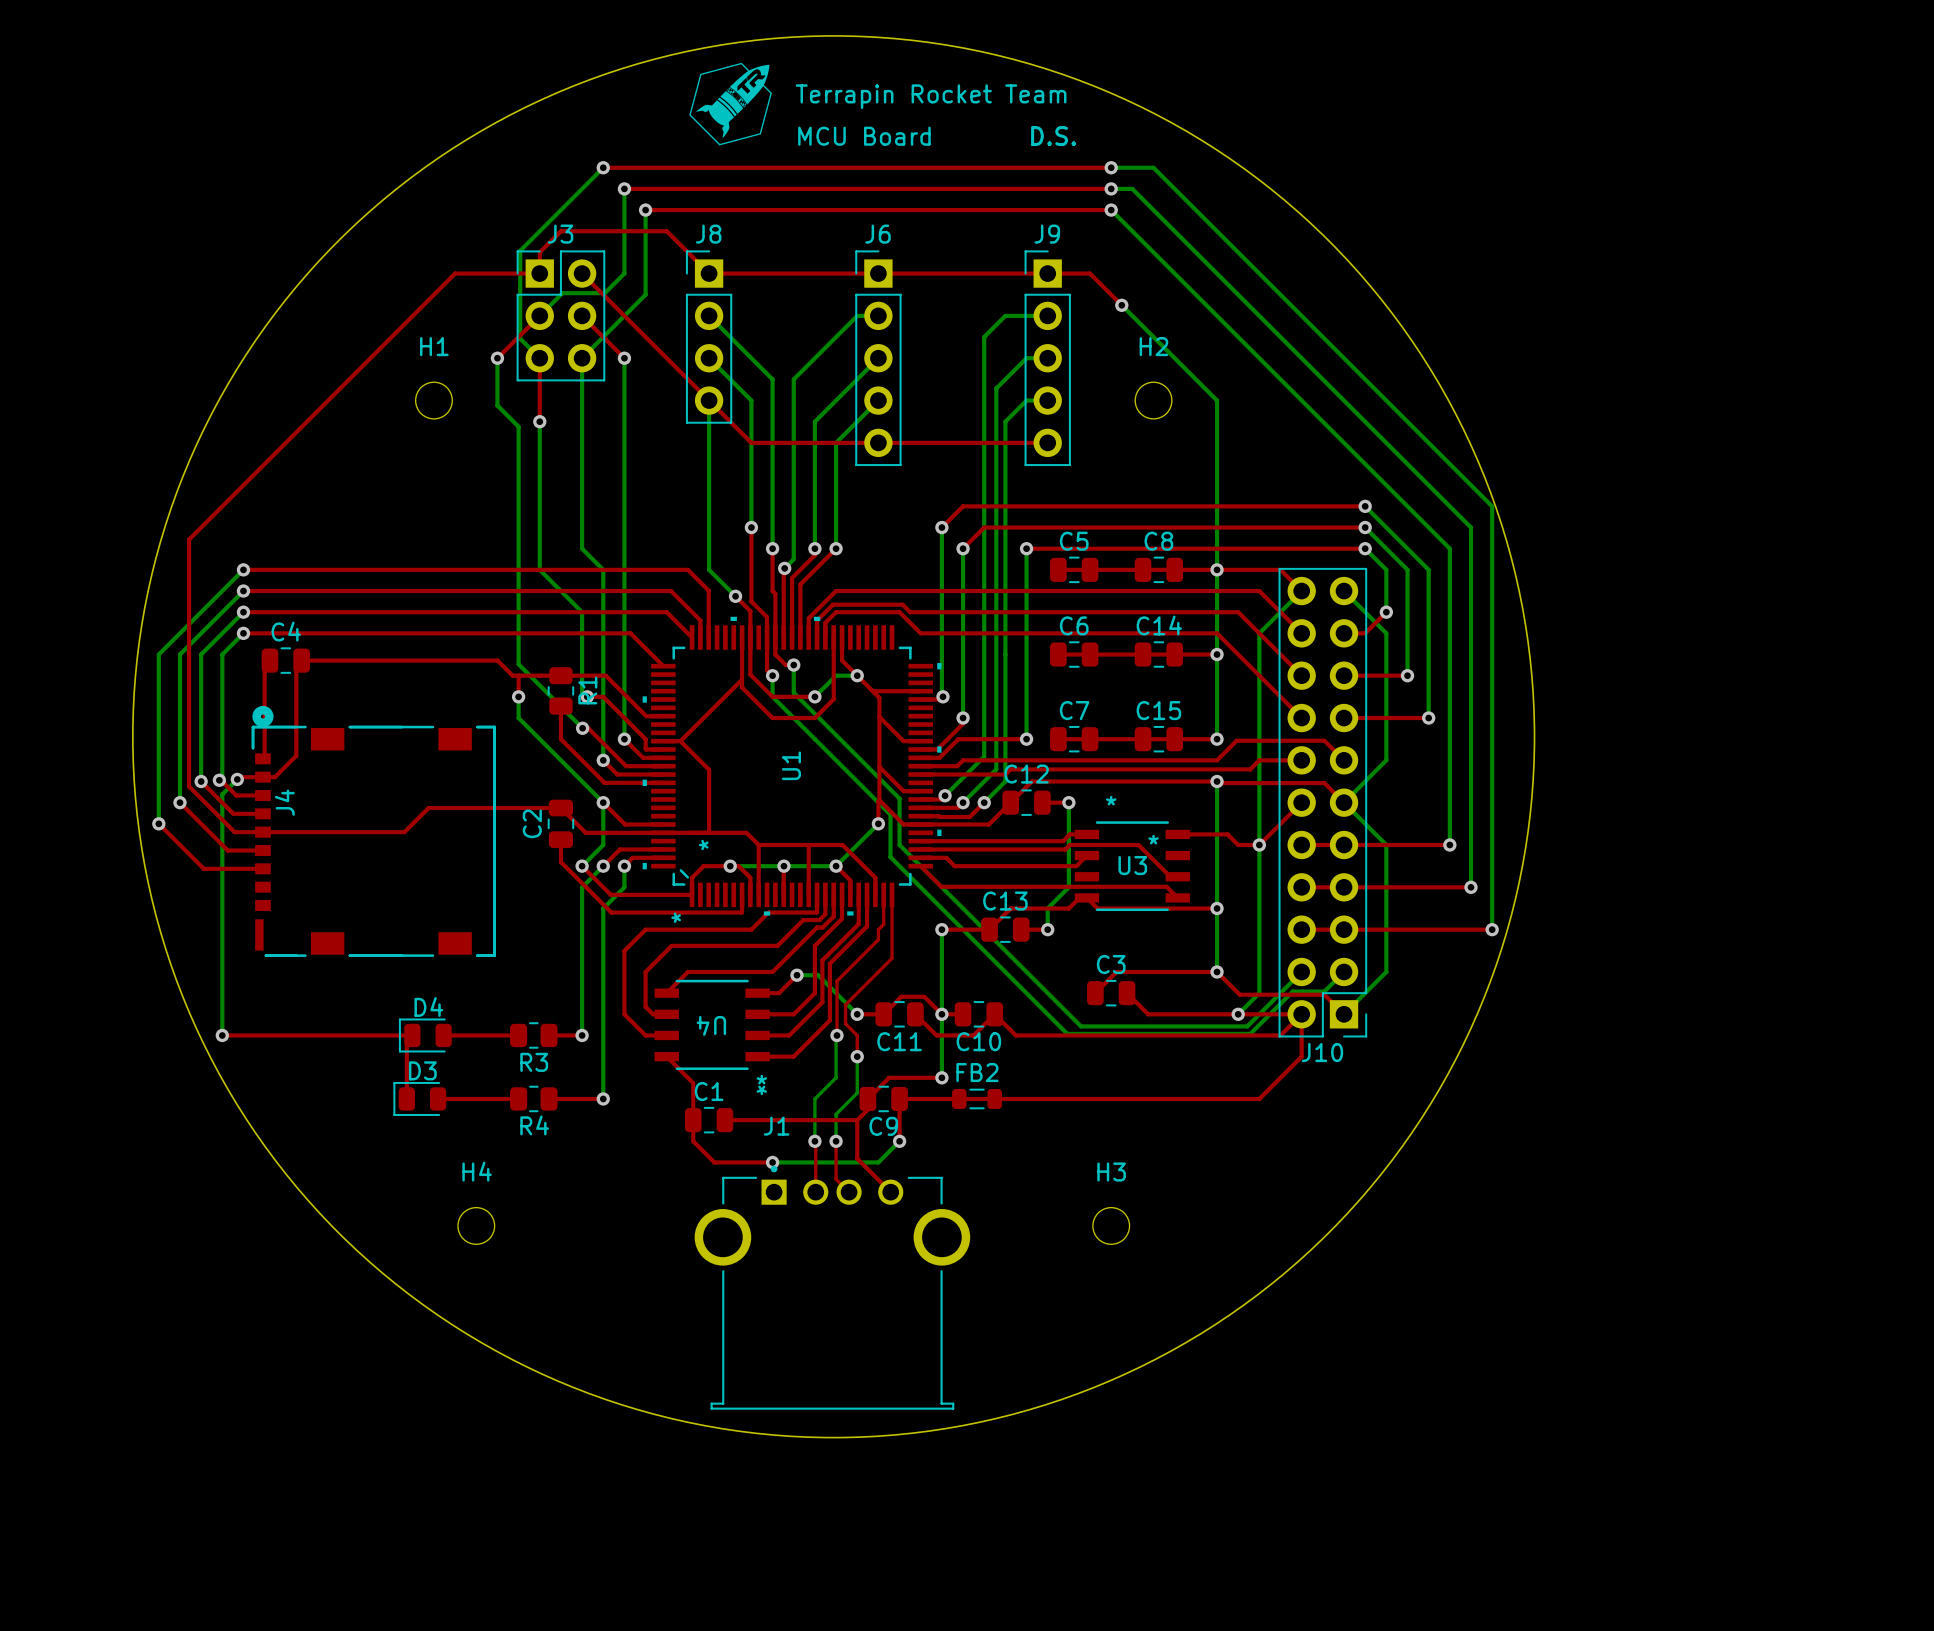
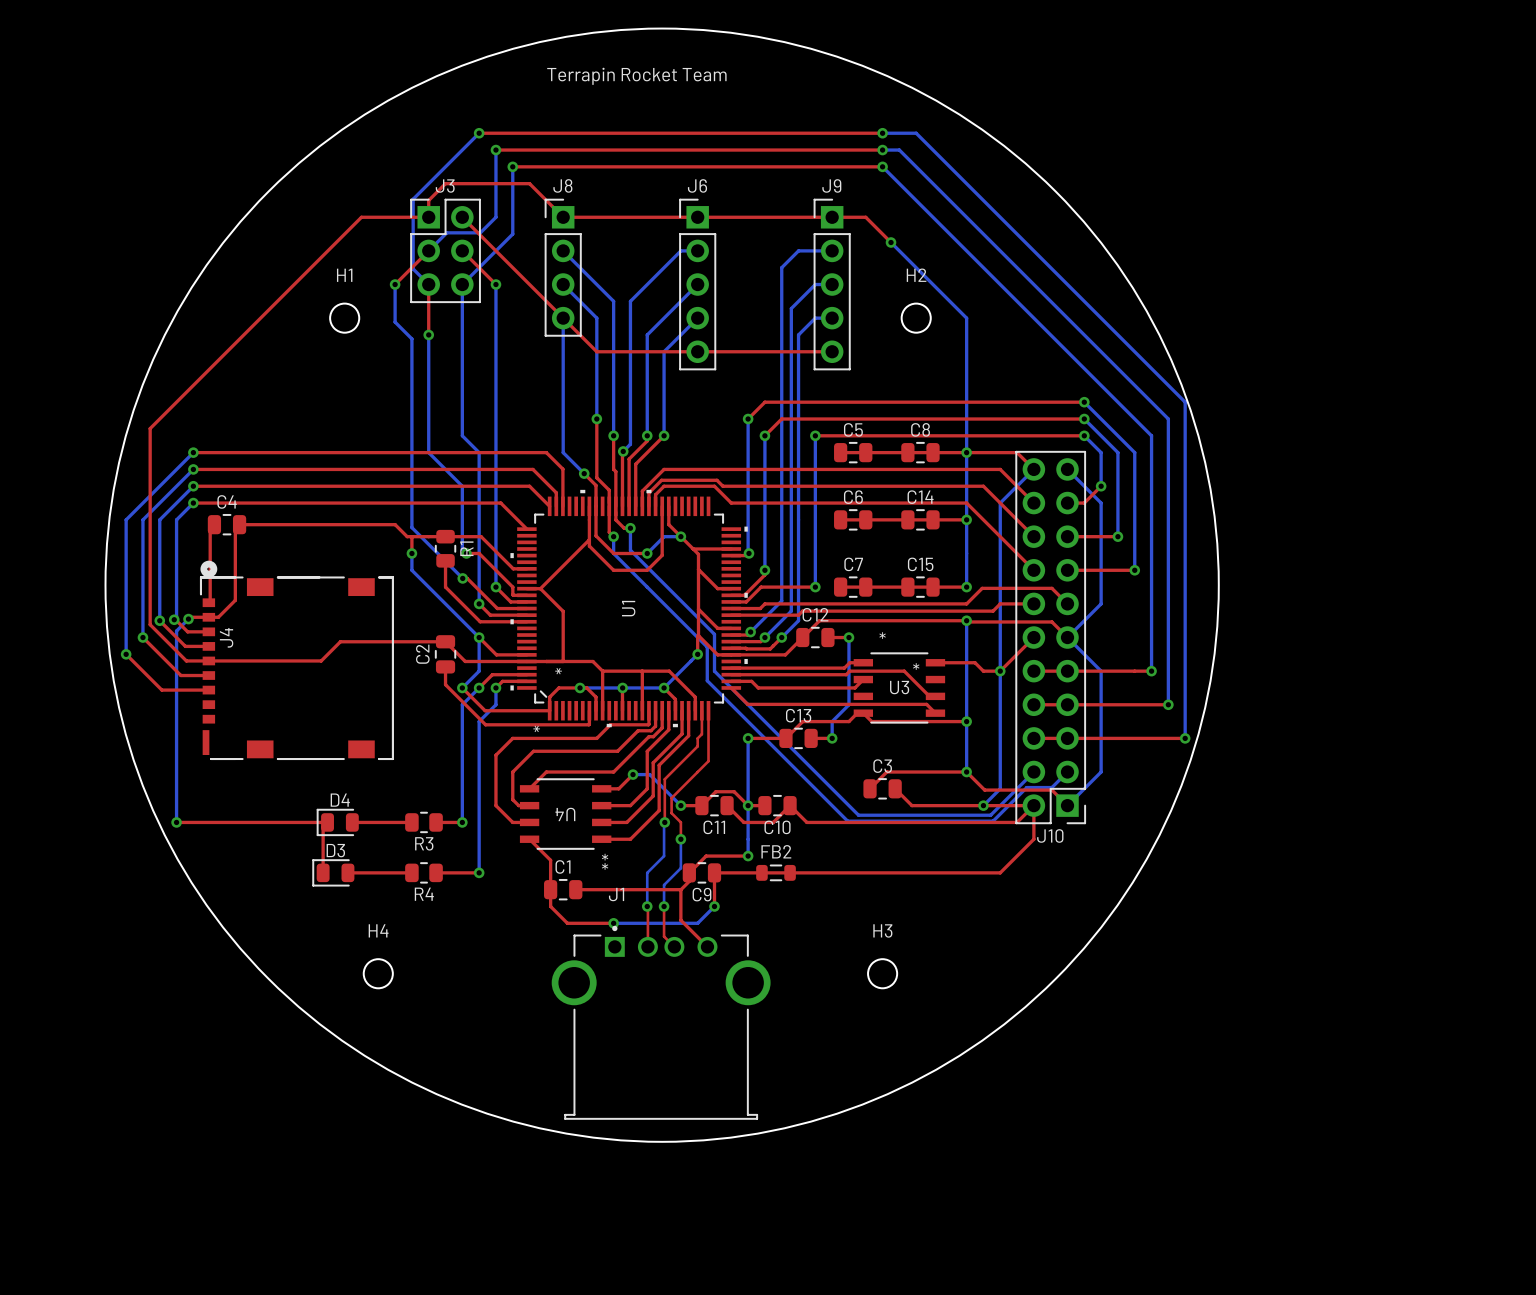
drawing: [689, 62, 772, 146] -> none
text position: Terrapin Rocket Team (931, 96) -> Terrapin Rocket Team (636, 76)
text: MCU Board (864, 136) -> none
text: D.S. (1053, 136) -> none

